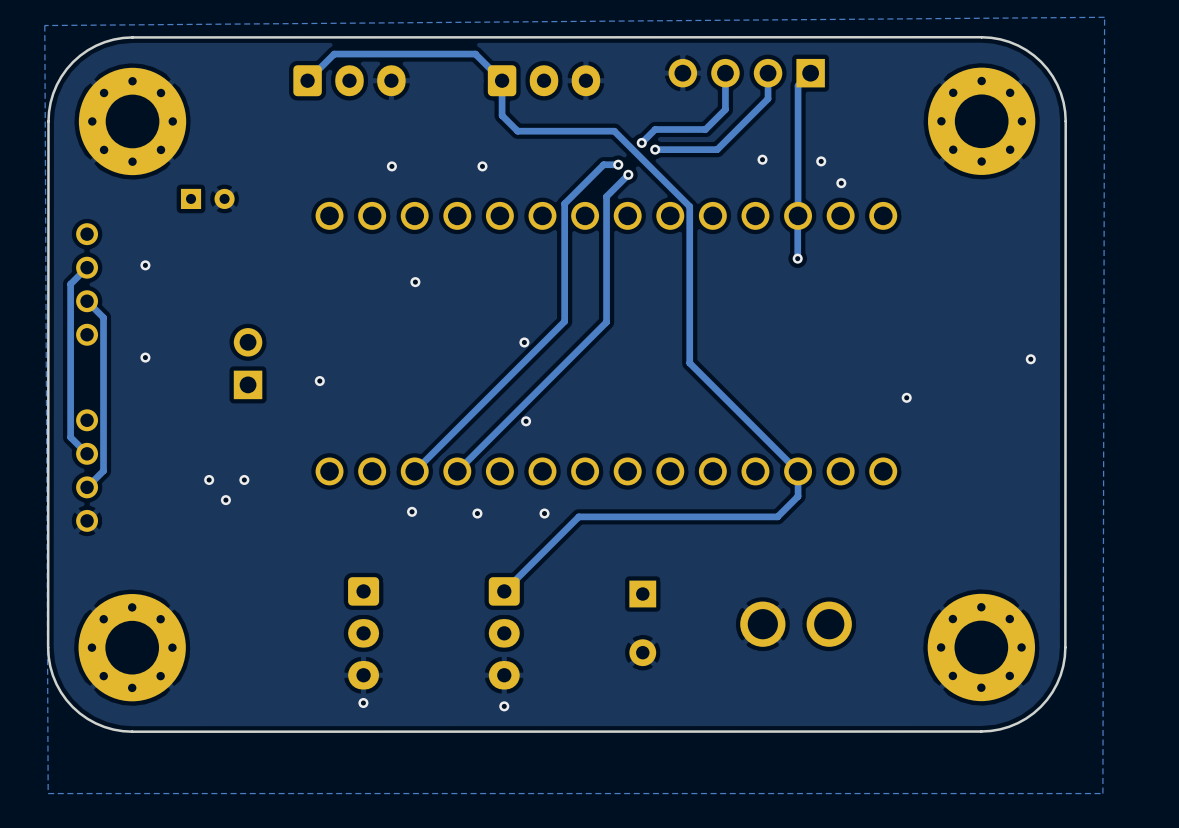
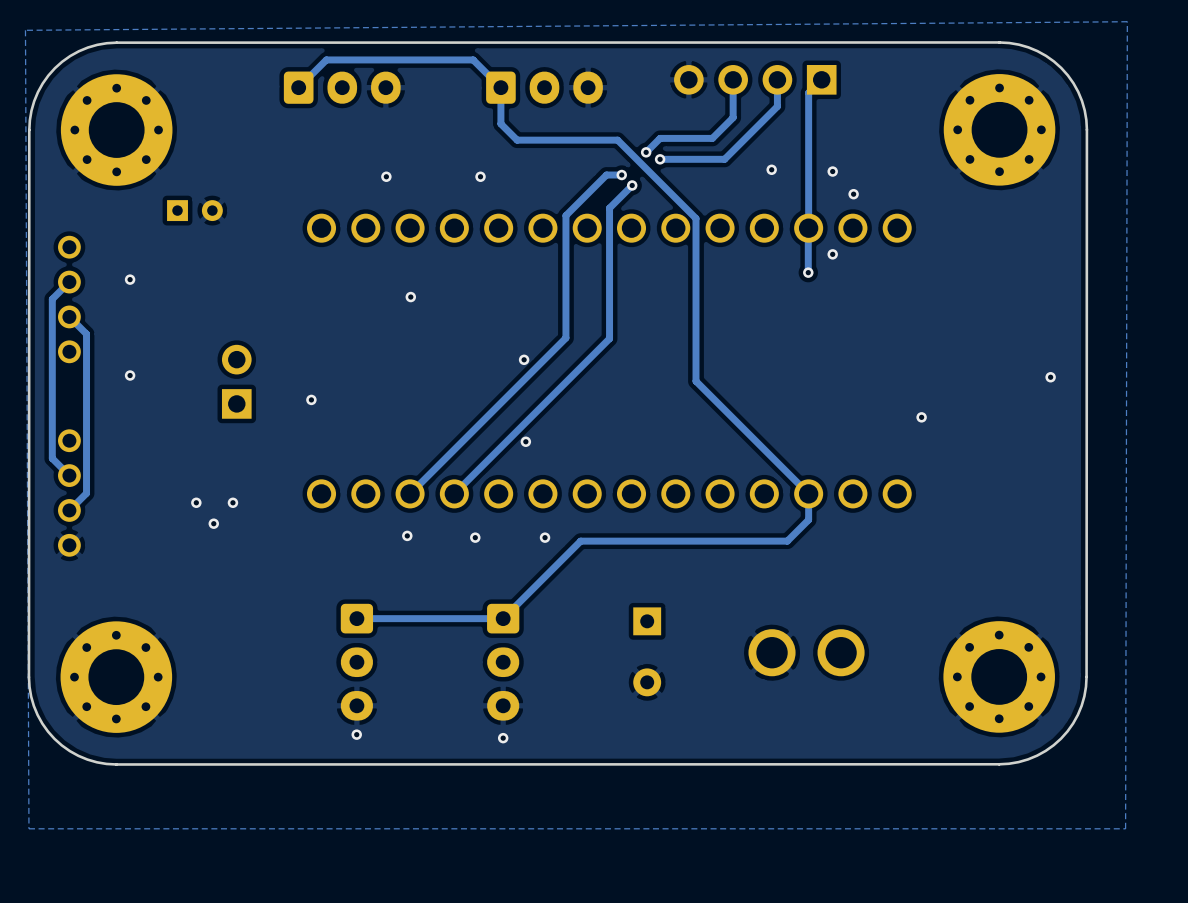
via: none -> (832, 254)
track: none -> (503, 618) (356, 618)

